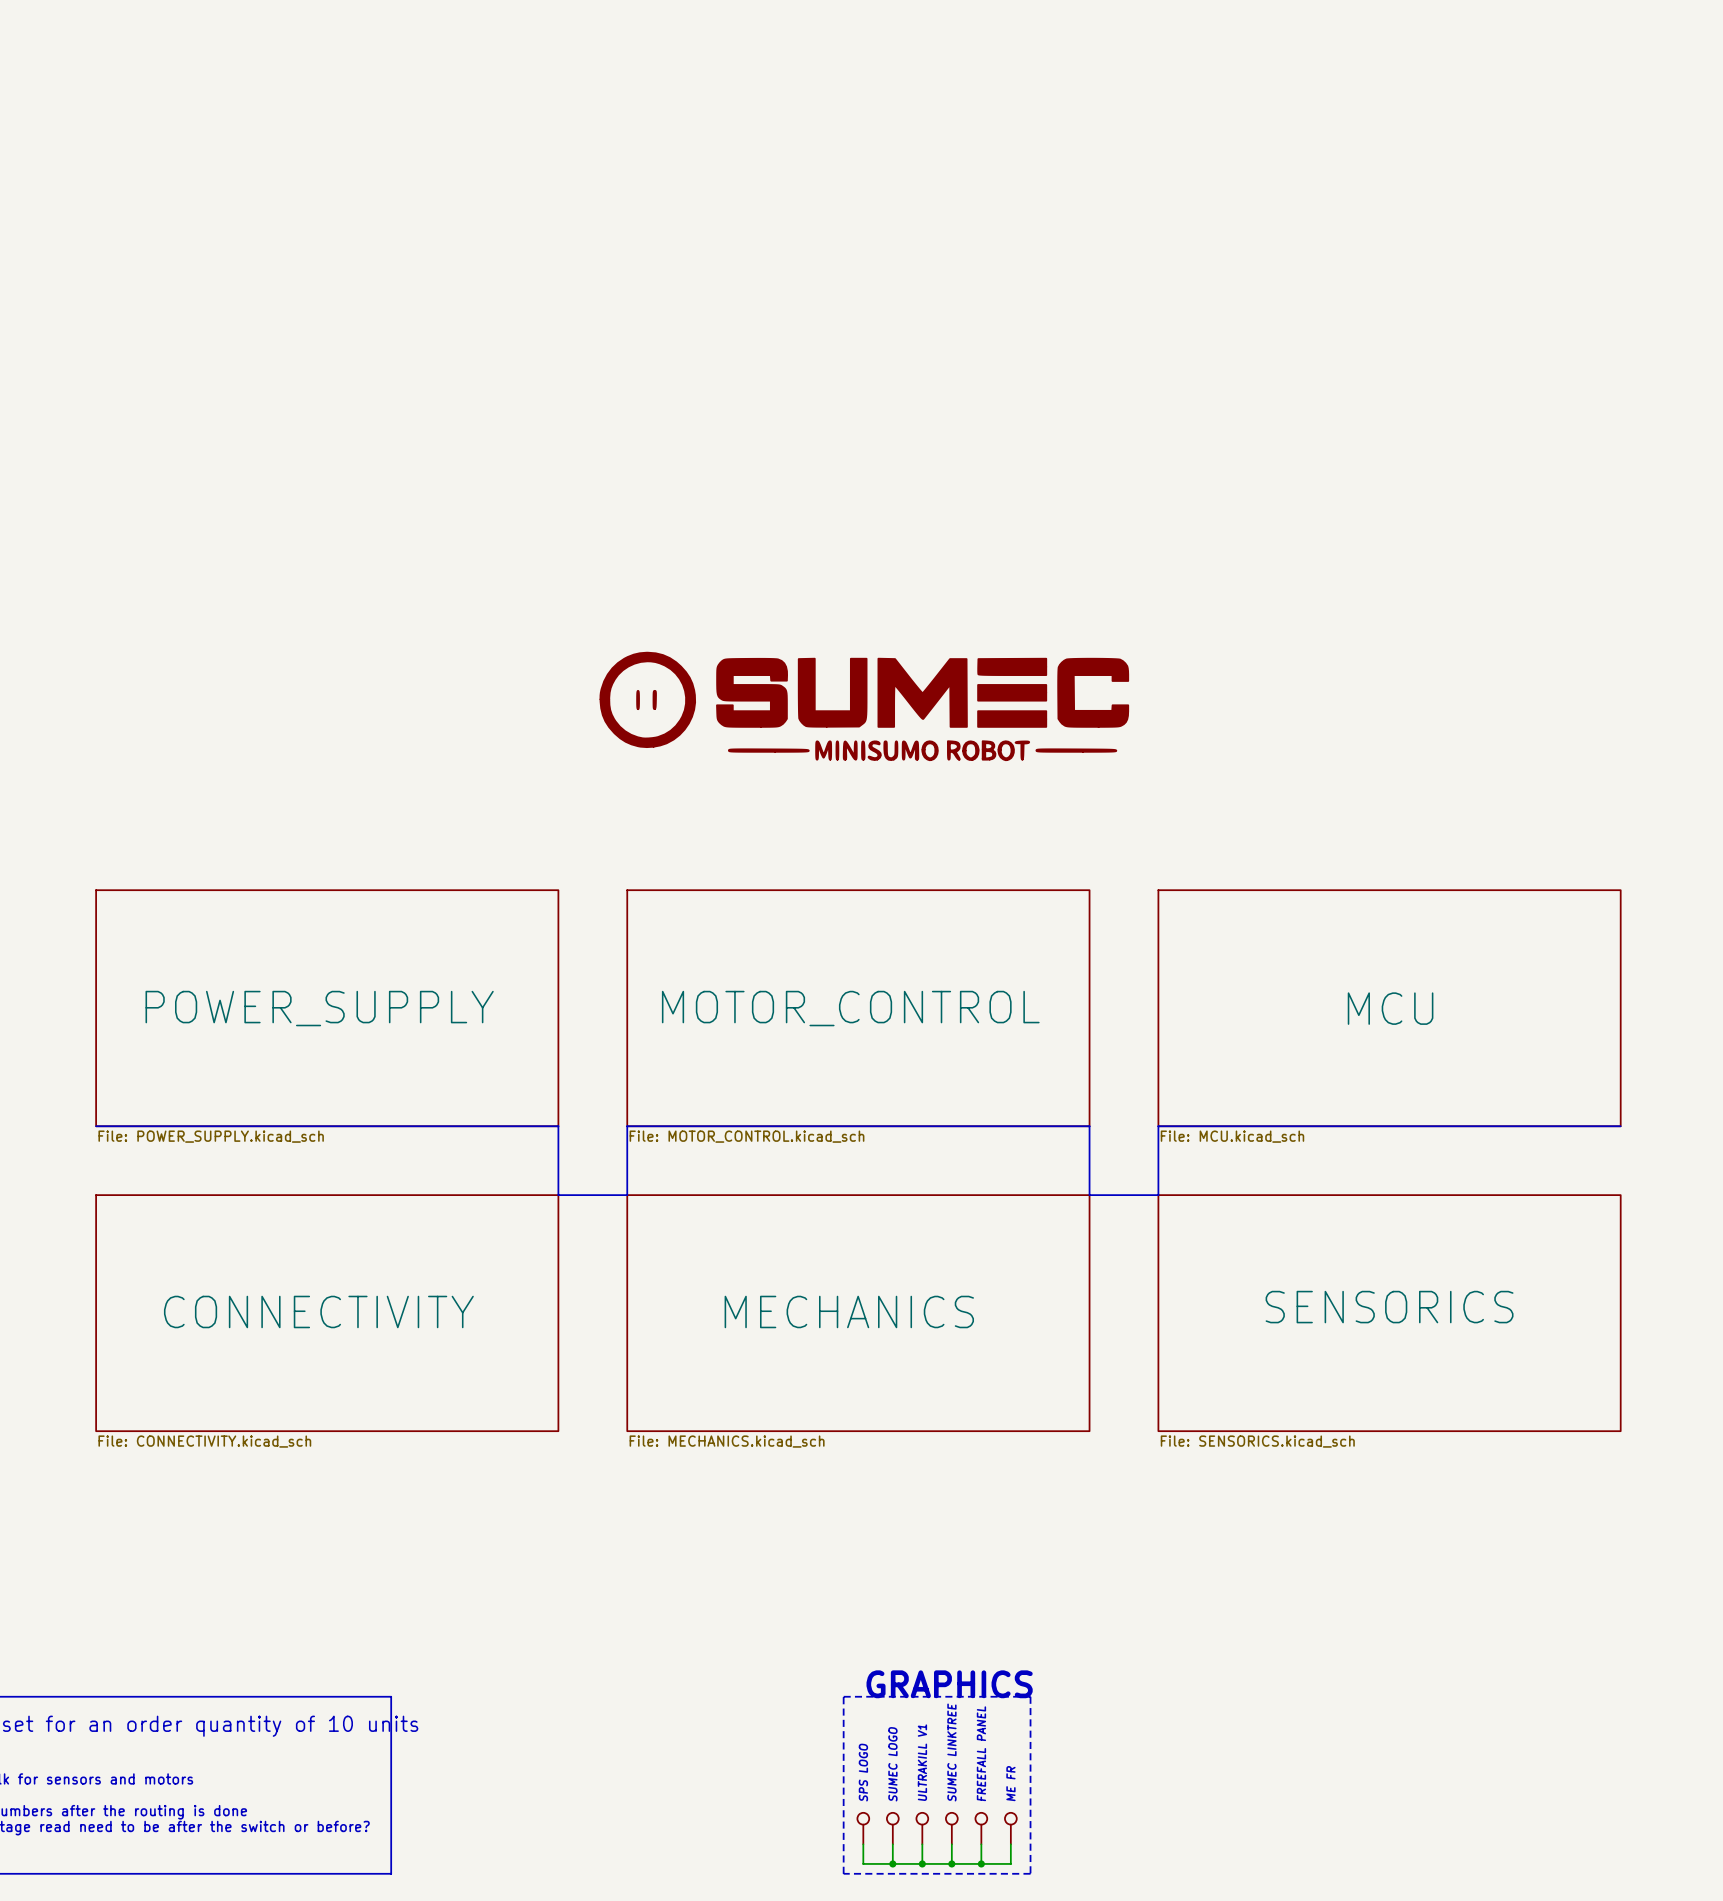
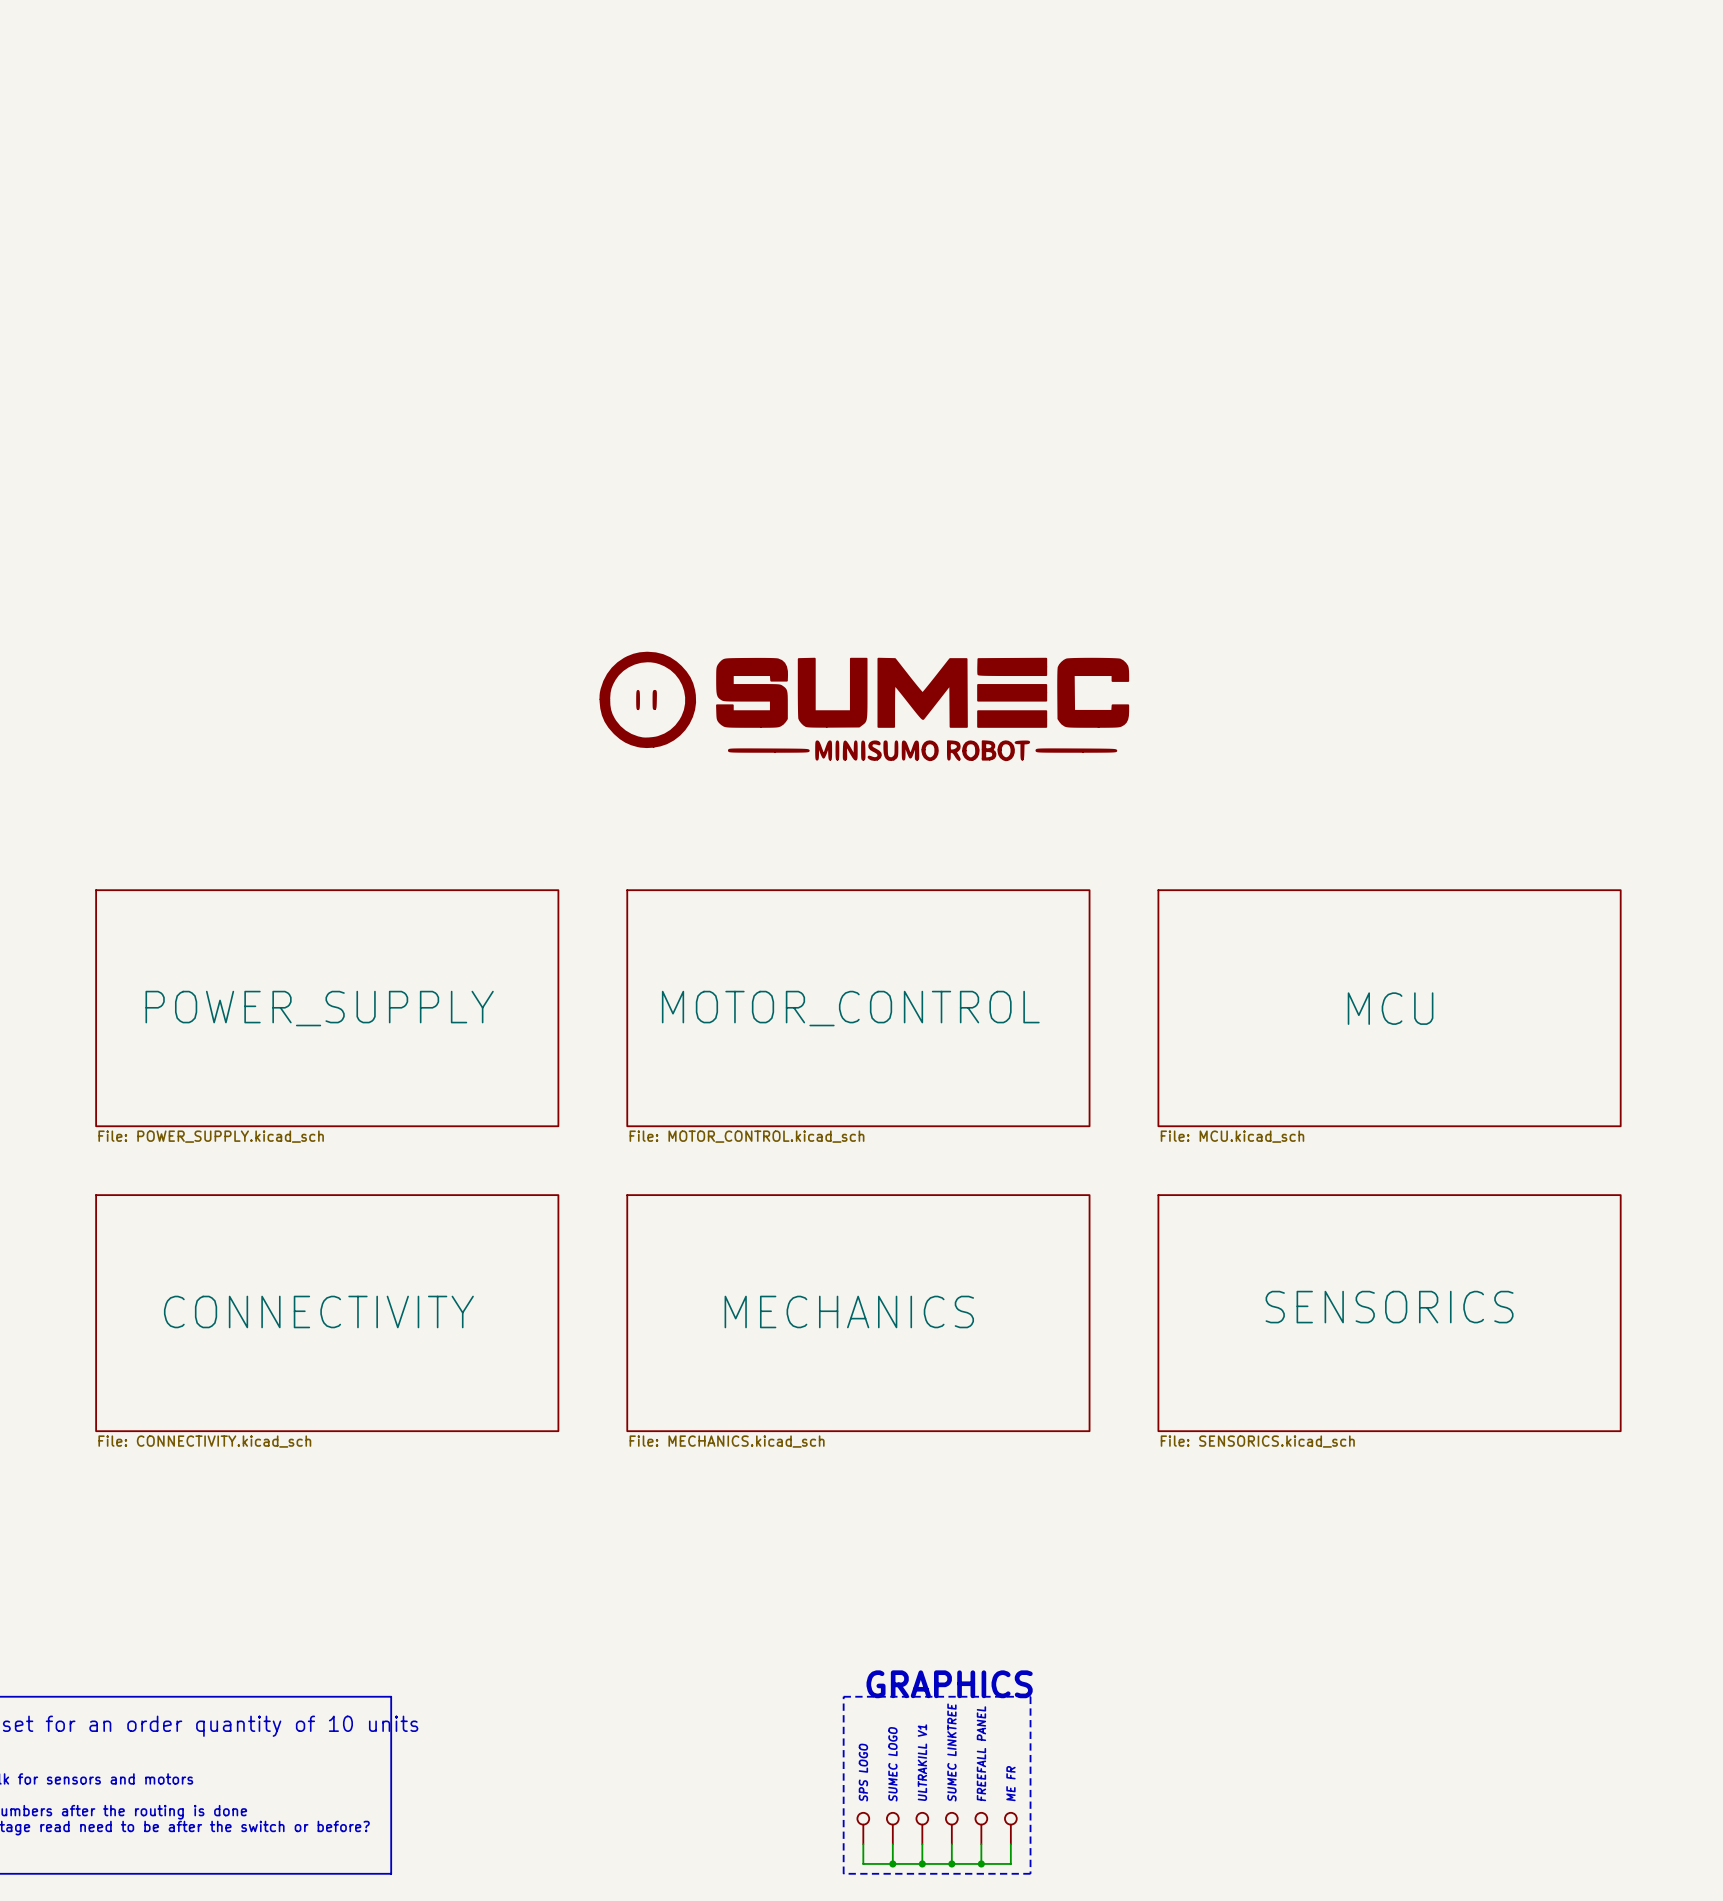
bus: (96, 1126) (558, 1126) (558, 1195) (627, 1195) (627, 1126) (1089, 1126) (1089, 1195) (1158, 1195) (1158, 1126) (1620, 1126) -> none

